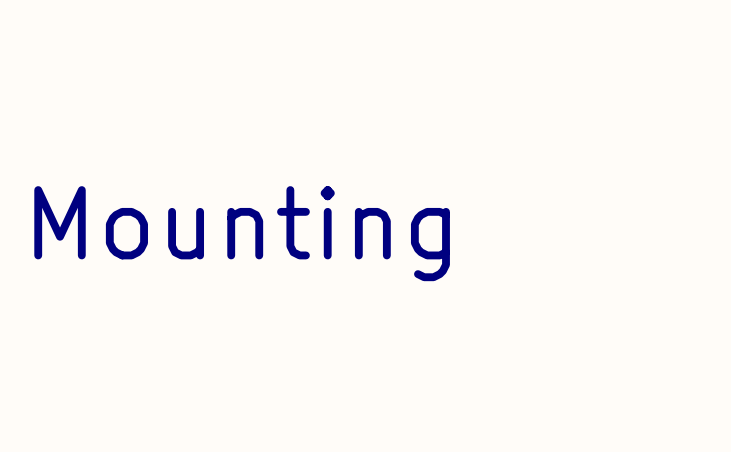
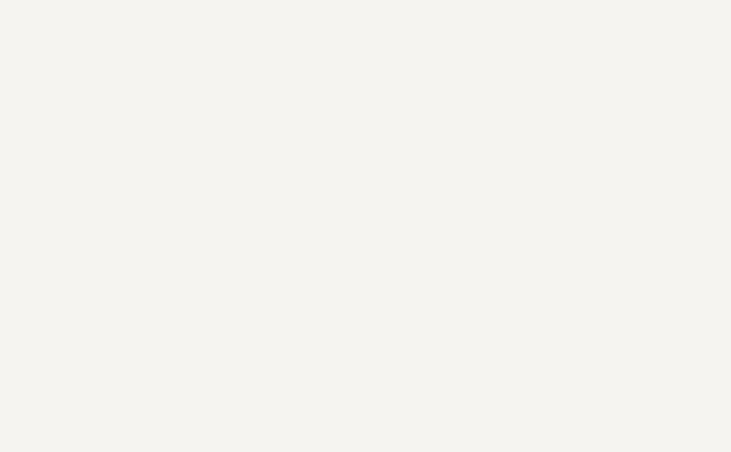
text: Mounting (242, 233) -> none

